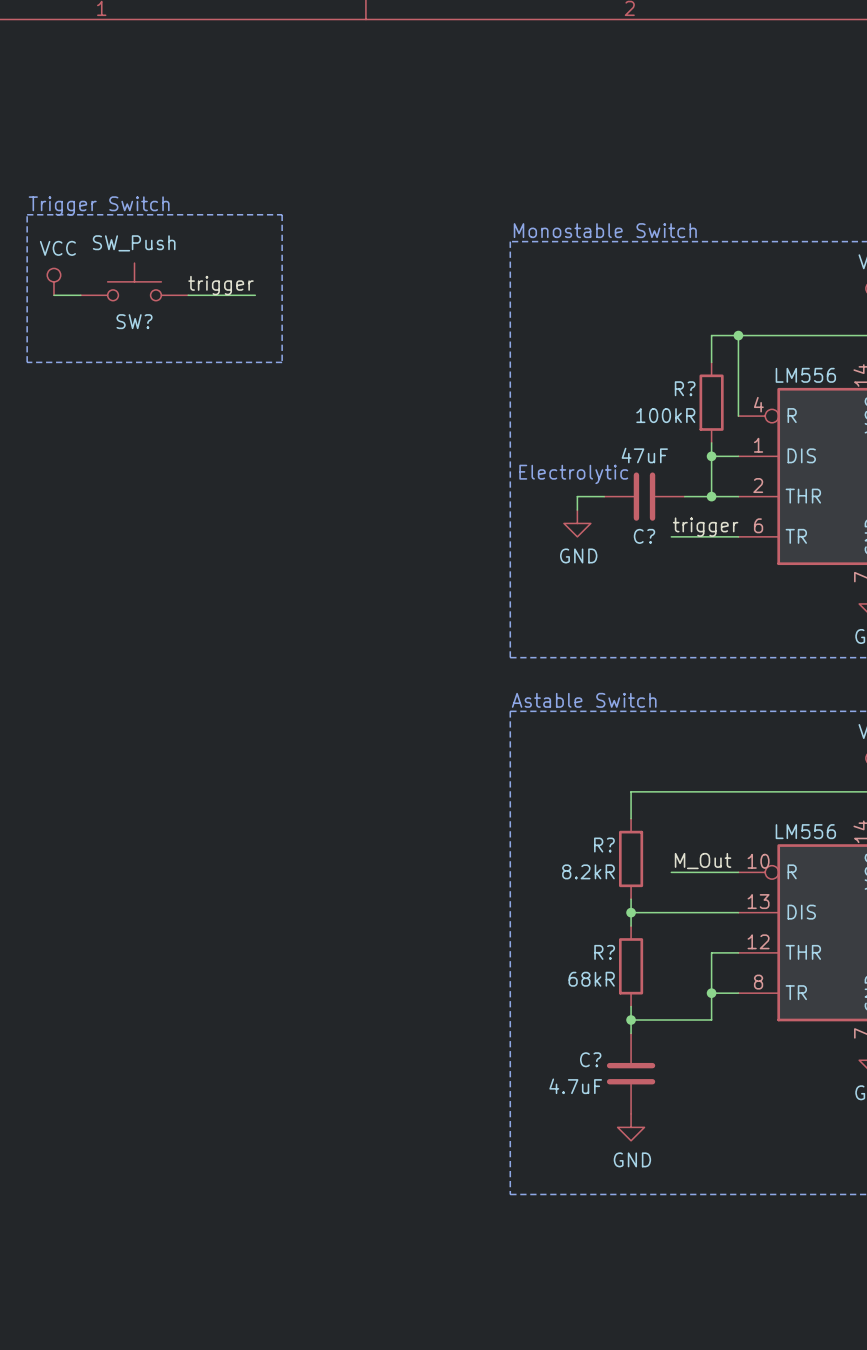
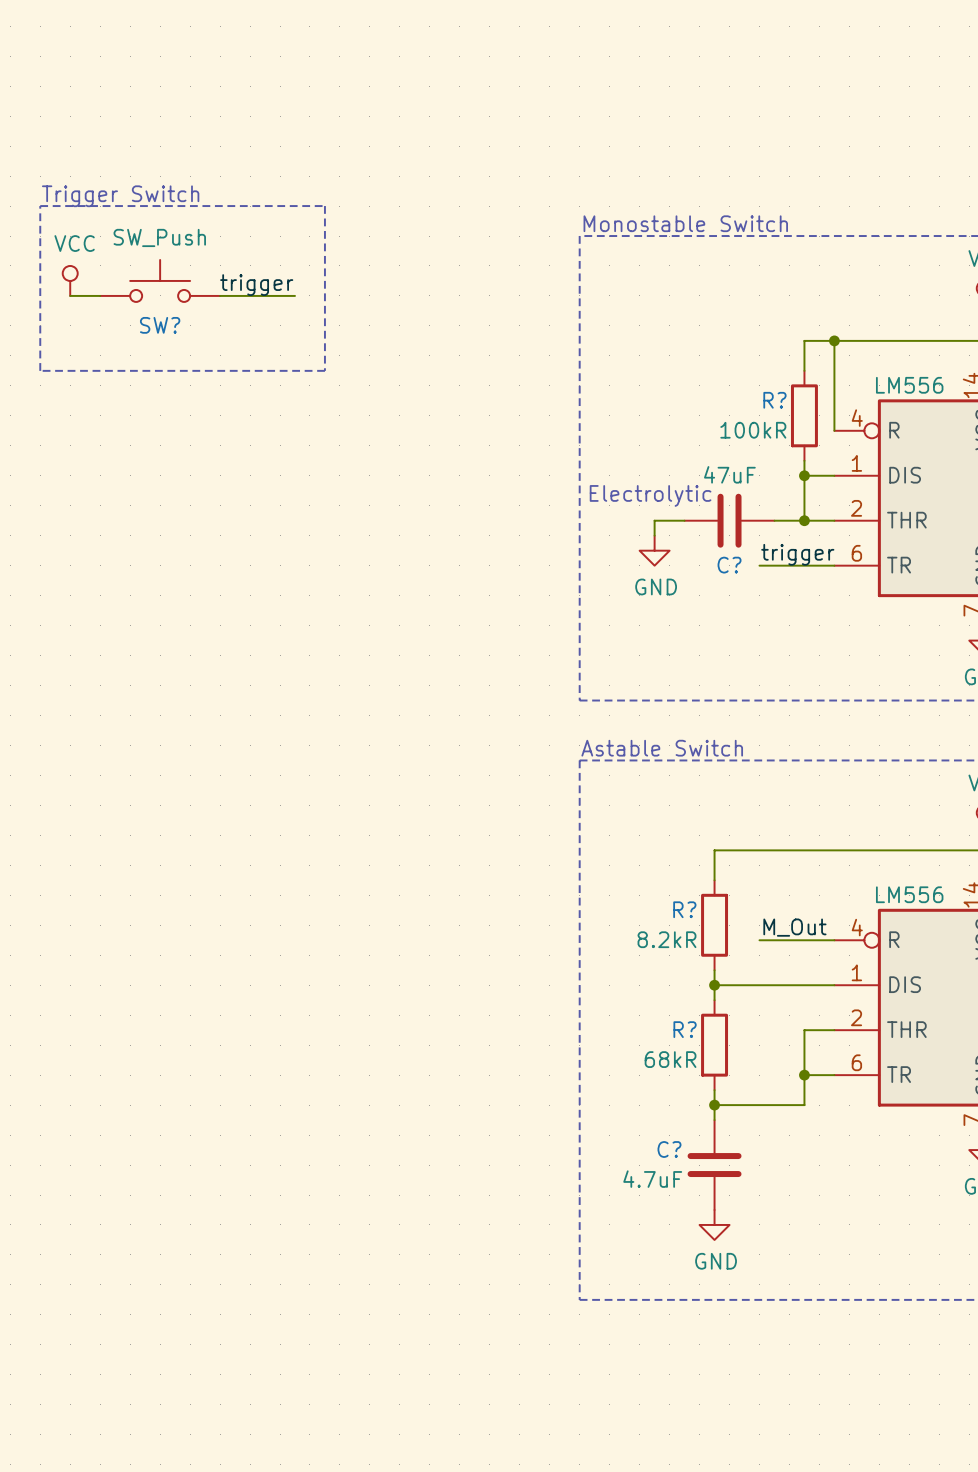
part pin number: 10 (758, 861) -> 4 (857, 927)
part pin number: 13 (758, 901) -> 1 (856, 972)
part pin number: 12 (758, 941) -> 2 (856, 1017)
part pin number: 8 (758, 982) -> 6 (856, 1062)

